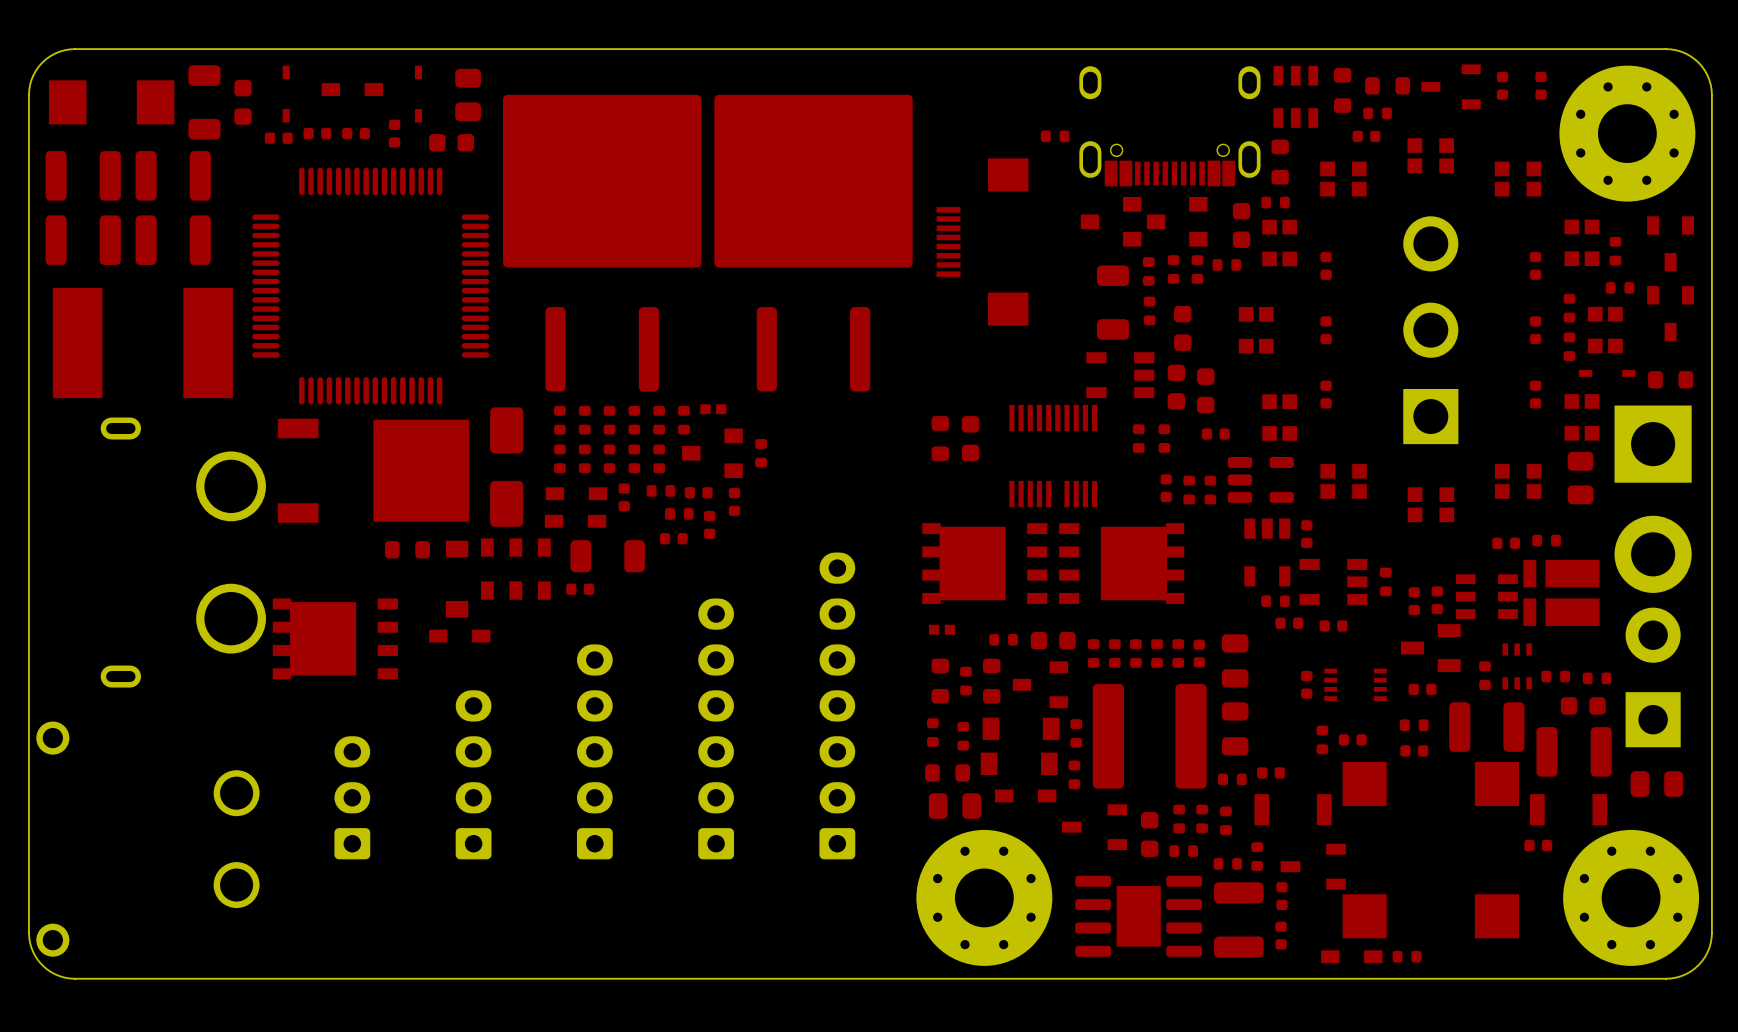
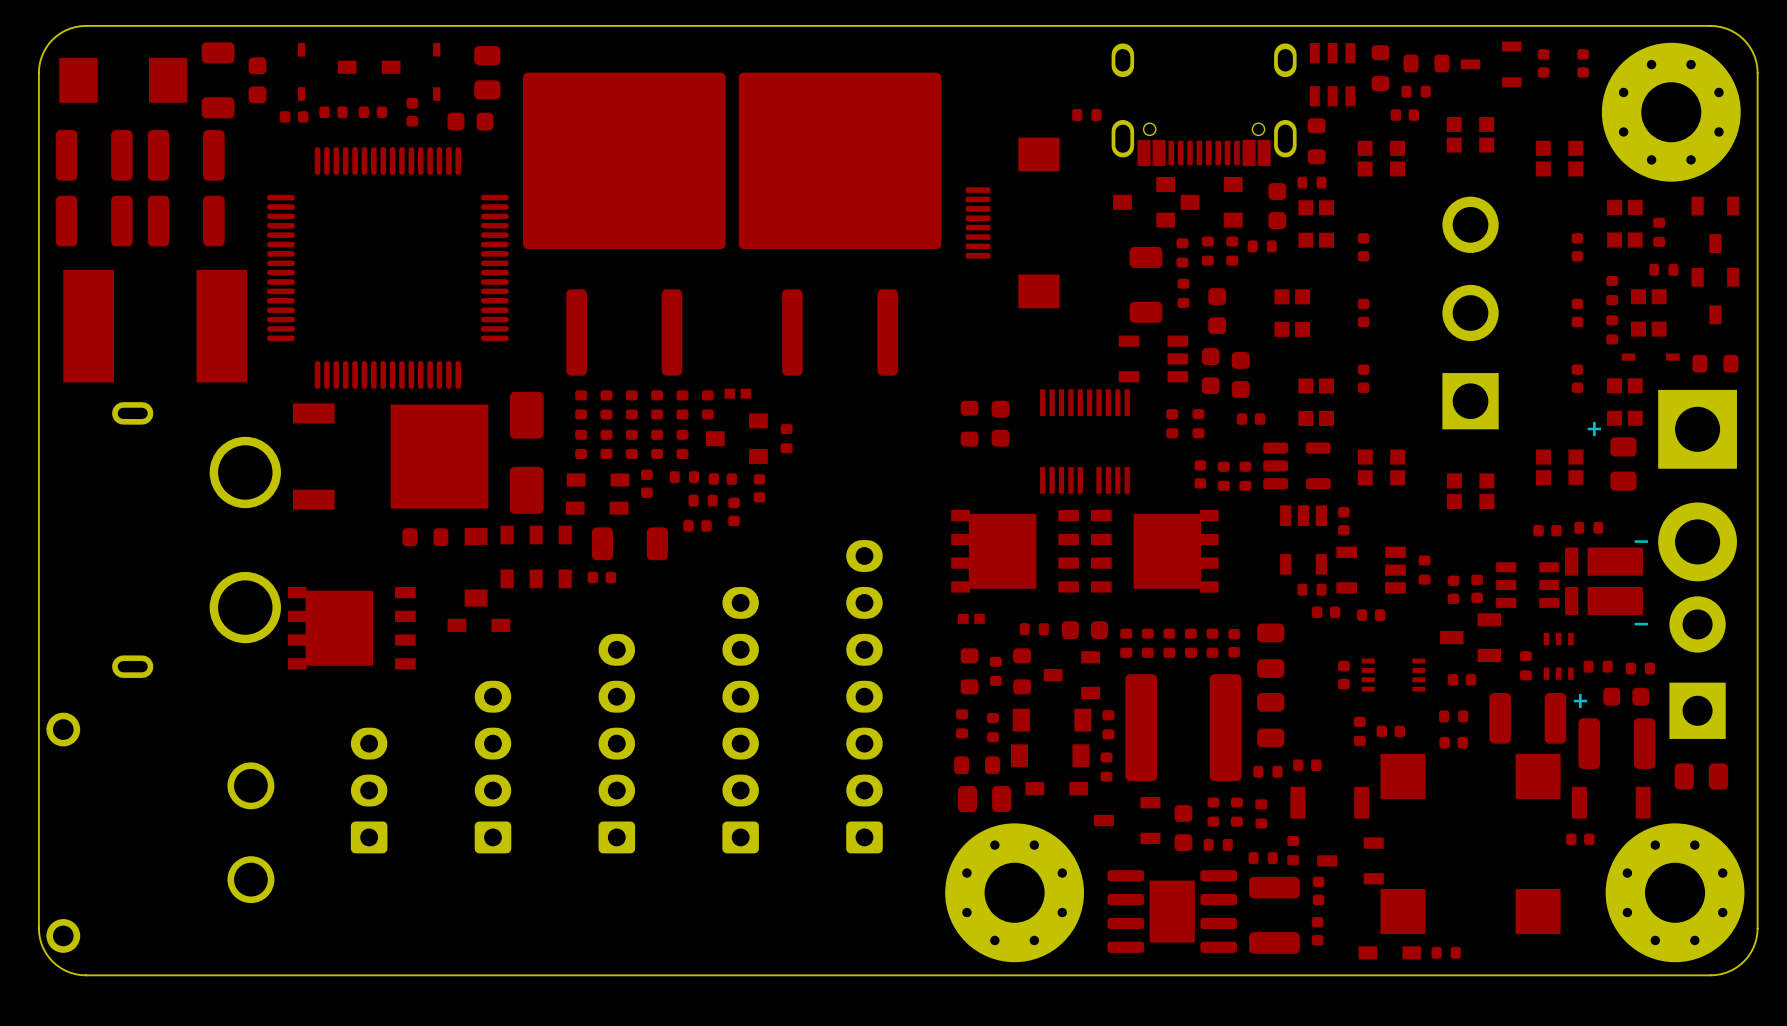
drawing: none -> [1587, 421, 1602, 437]
drawing: none -> [1634, 540, 1648, 543]
drawing: none -> [1634, 622, 1648, 626]
drawing: none -> [1573, 693, 1587, 709]

